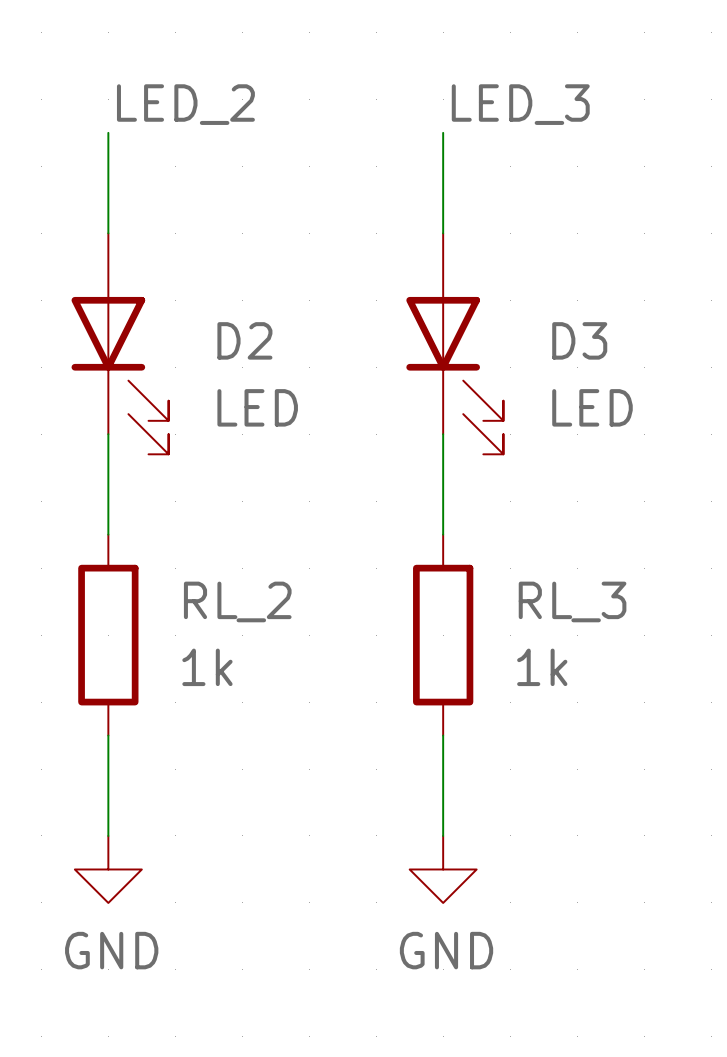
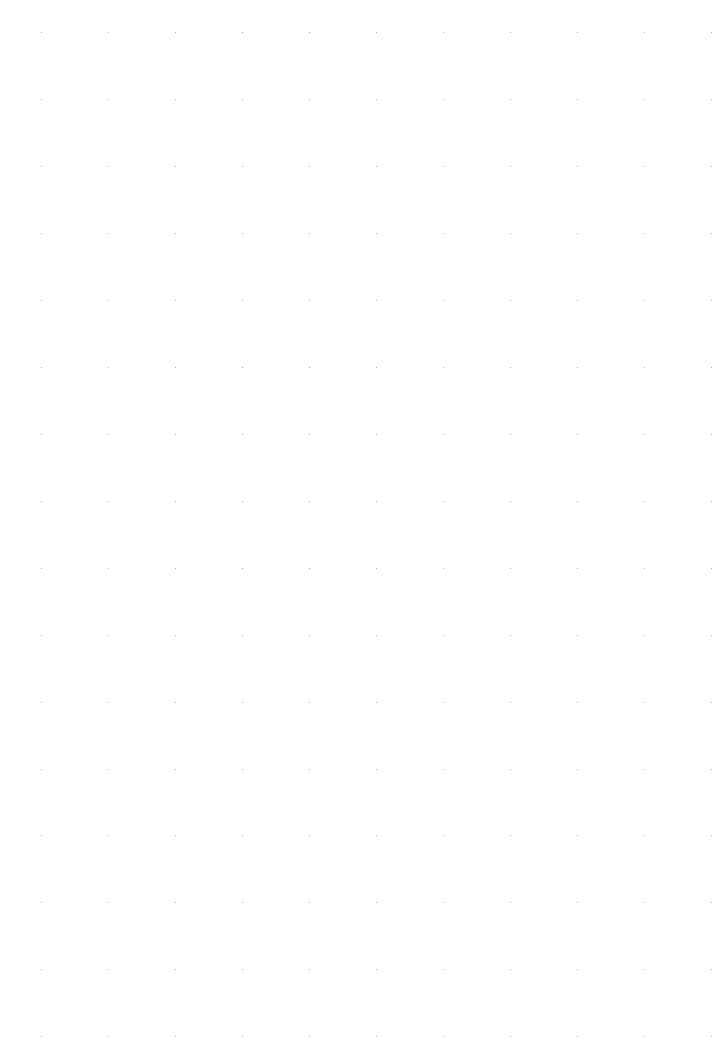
label: LED_2 (185, 104) -> none
label: LED_3 (520, 104) -> none
wire: (108, 132) (108, 233) -> none
wire: (443, 132) (443, 233) -> none
D2: LED (120, 343) -> none
D3: LED (454, 343) -> none
wire: (108, 434) (108, 534) -> none
wire: (443, 434) (443, 534) -> none
RL_2: 1k (108, 635) -> none
RL_3: 1k (443, 635) -> none
wire: (108, 735) (108, 835) -> none
wire: (443, 735) (443, 835) -> none
power symbol: GND (108, 869) -> none
power symbol: GND (443, 869) -> none

